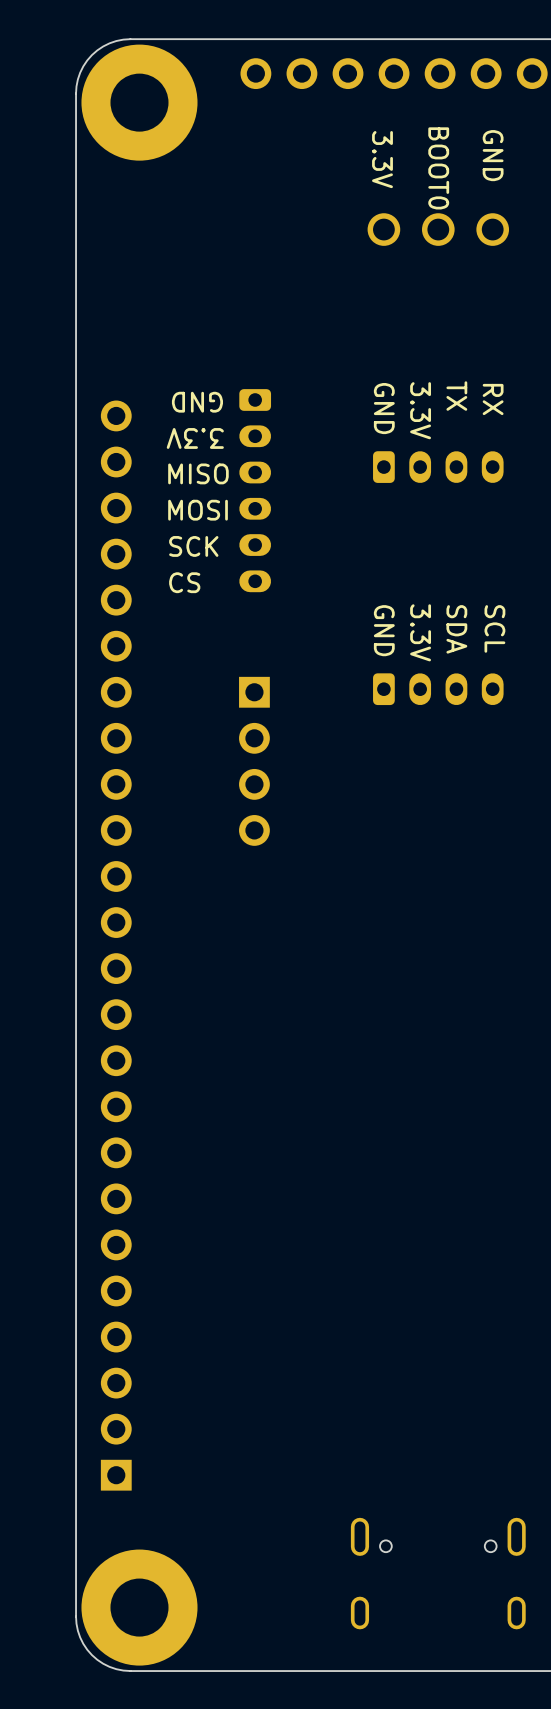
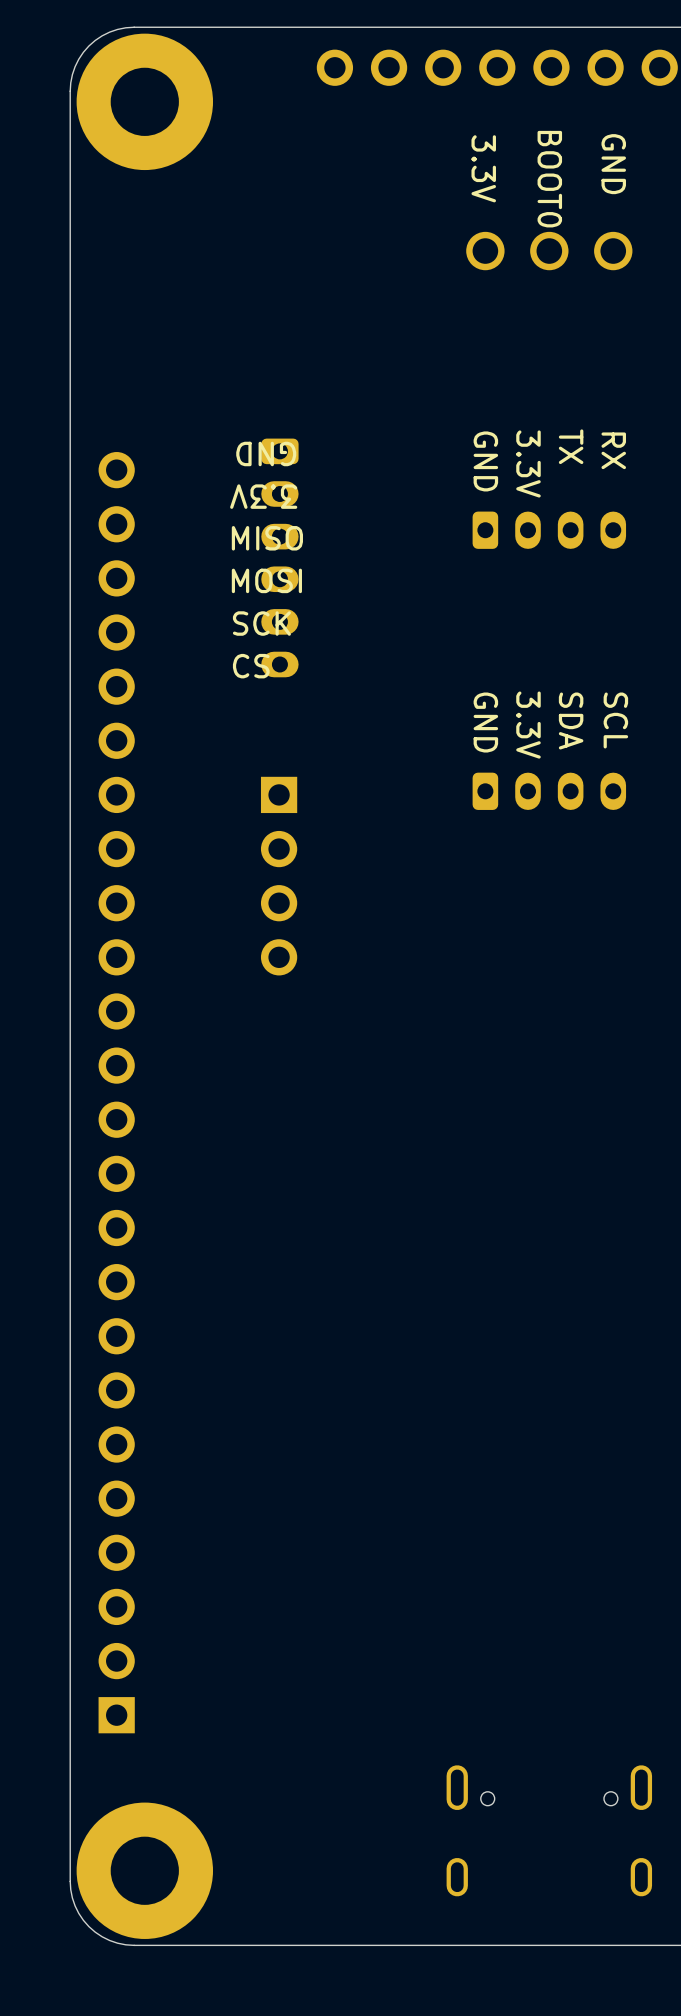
board edge: (130, 39) (109, 43) (91, 55) (80, 72) (76, 93) (76, 1616) (80, 1637) (91, 1655) (109, 1666) (130, 1671) -> (187, 27) (125, 27) (102, 35) (88, 45) (78, 59) (72, 74) (70, 91) (70, 1881) (72, 1897) (78, 1913) (88, 1926) (102, 1936) (125, 1944) (187, 1945)
part position: (139, 102) -> (144, 101)
part position: (255, 490) -> (279, 557)
part position: (254, 761) -> (279, 876)
part position: (116, 945) -> (116, 1092)
part position: (139, 1607) -> (144, 1870)

